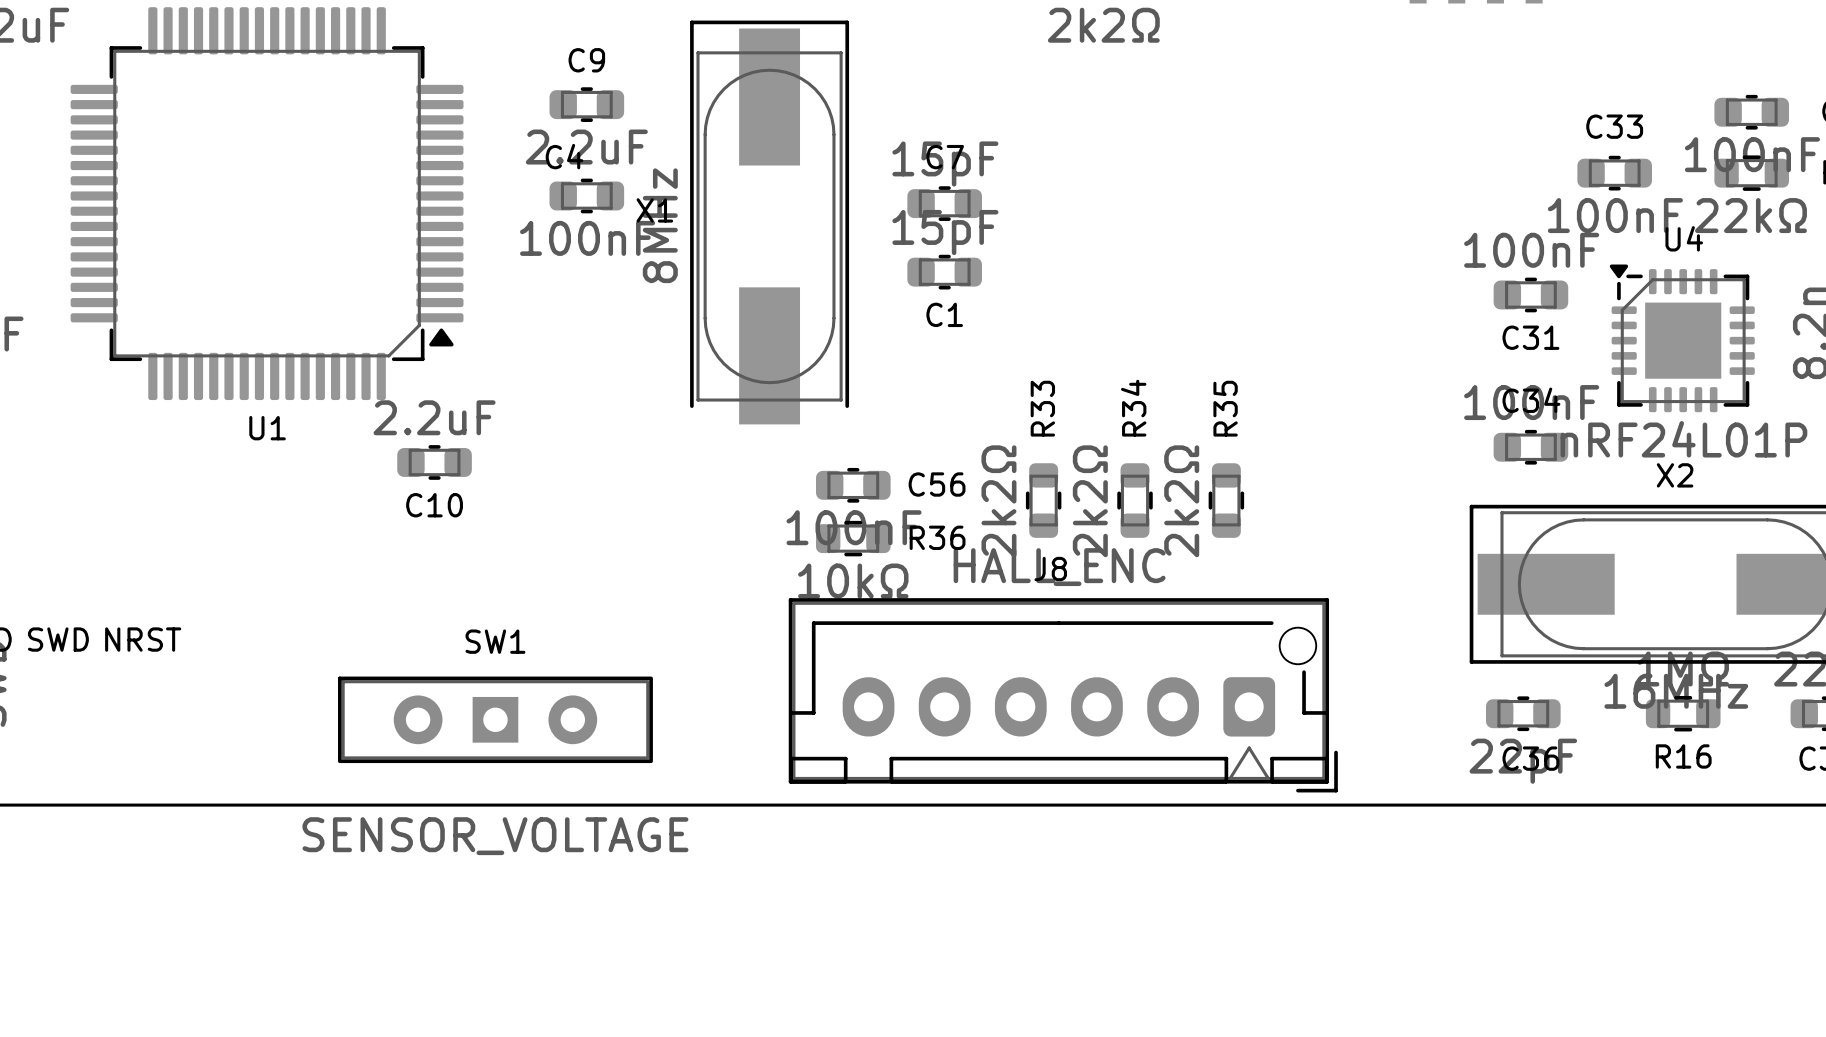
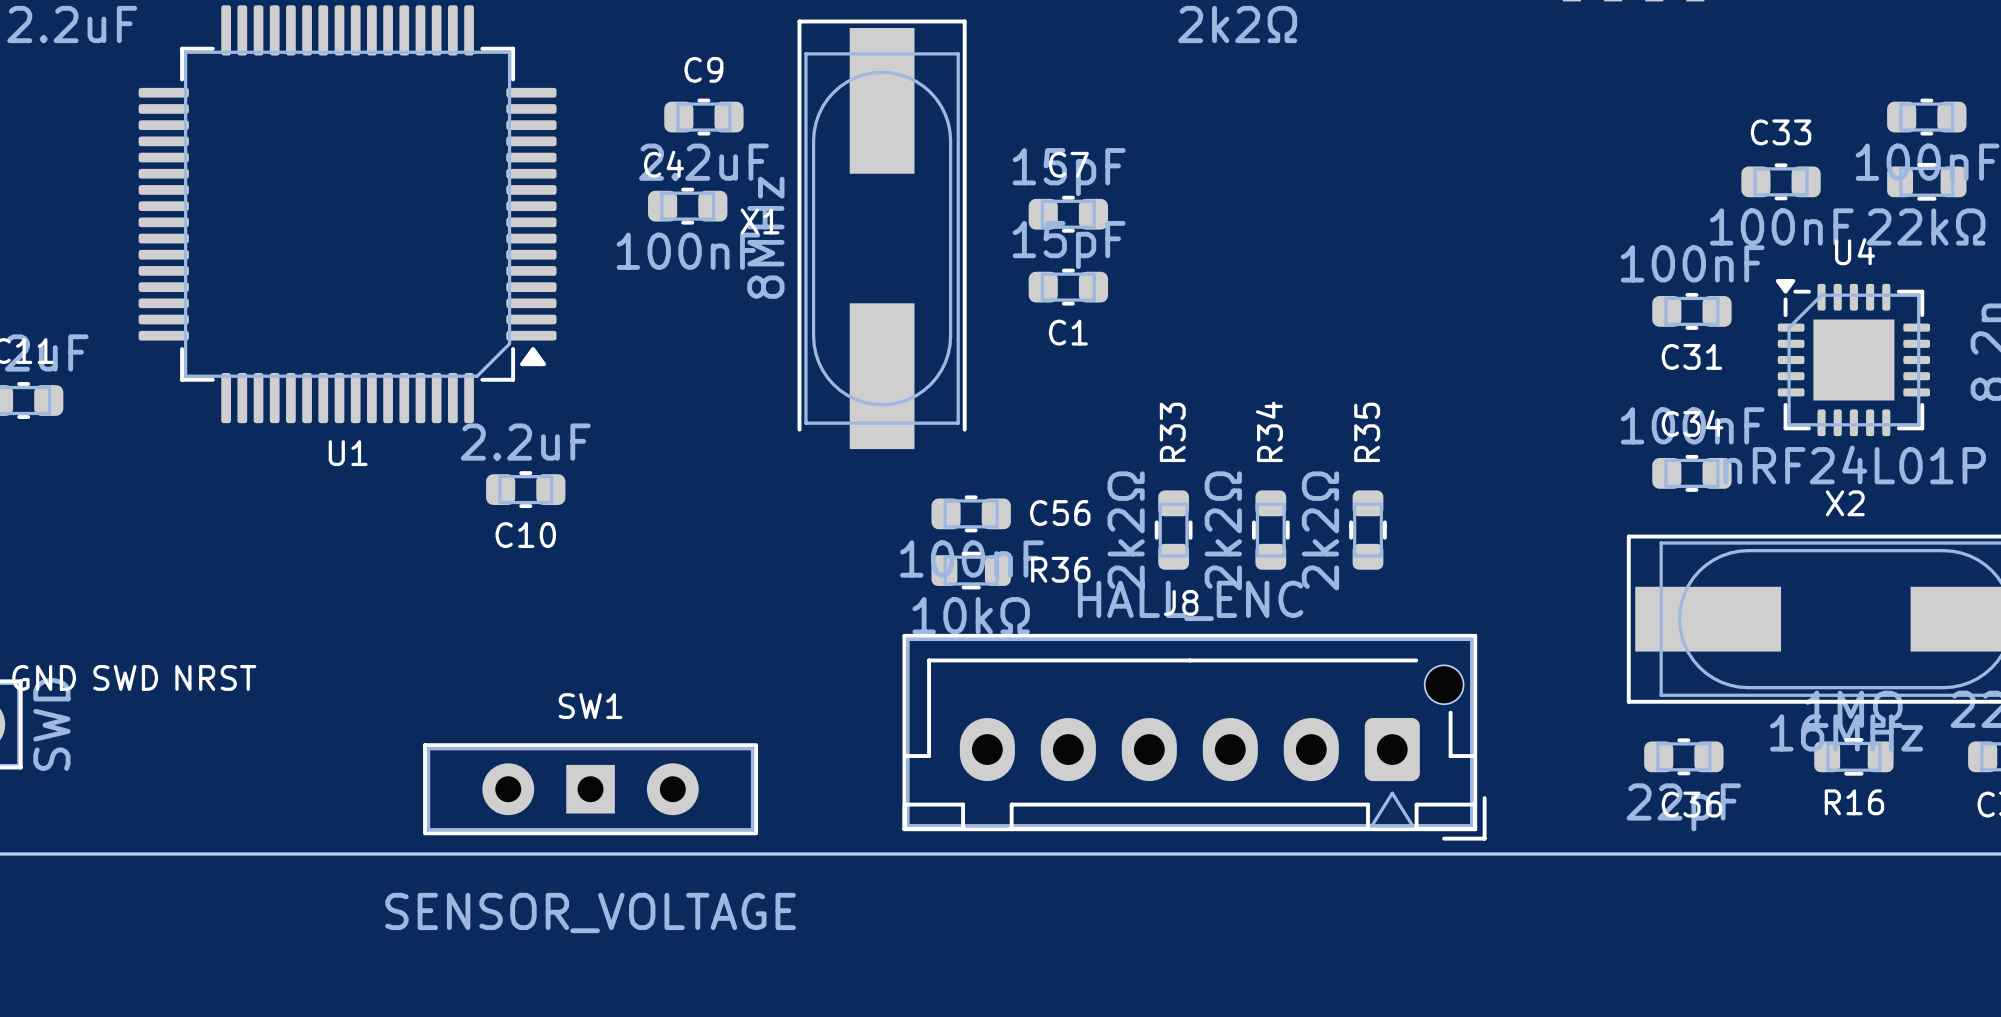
C9 position: (586, 104) -> (703, 117)
SW1 position: (495, 719) -> (590, 789)

